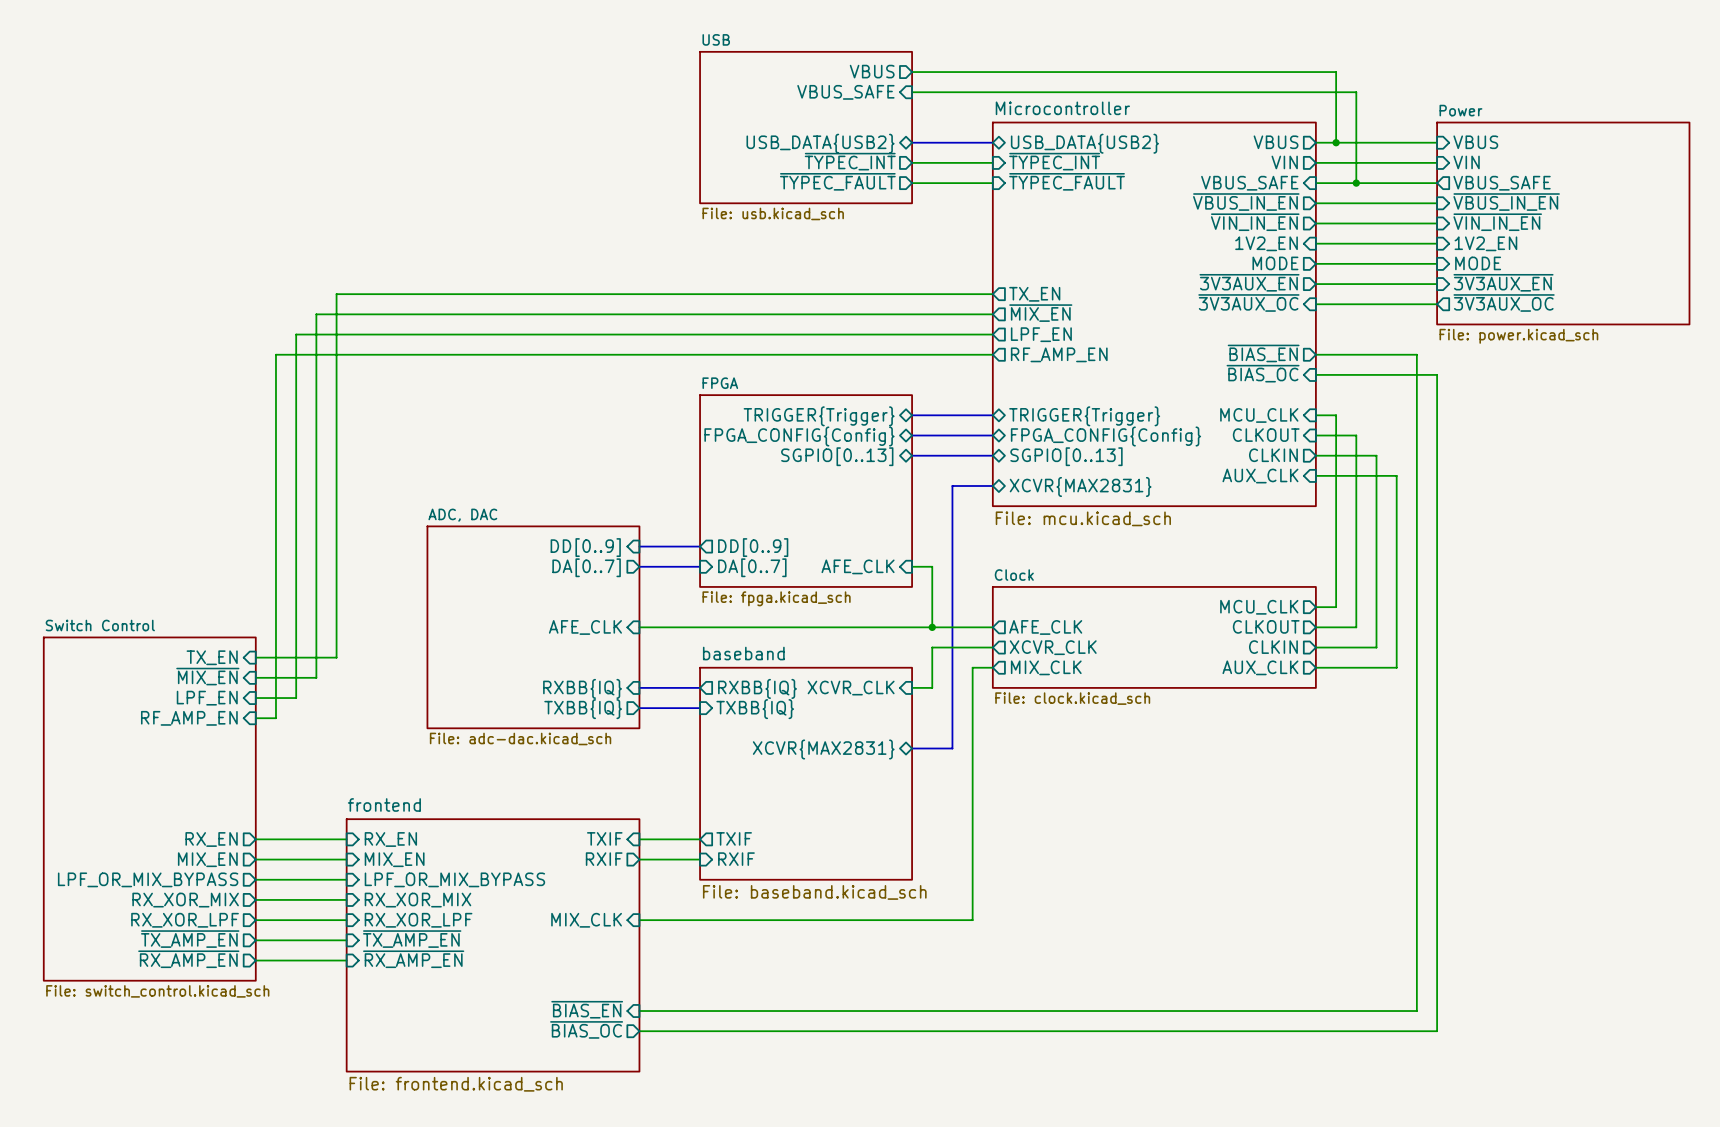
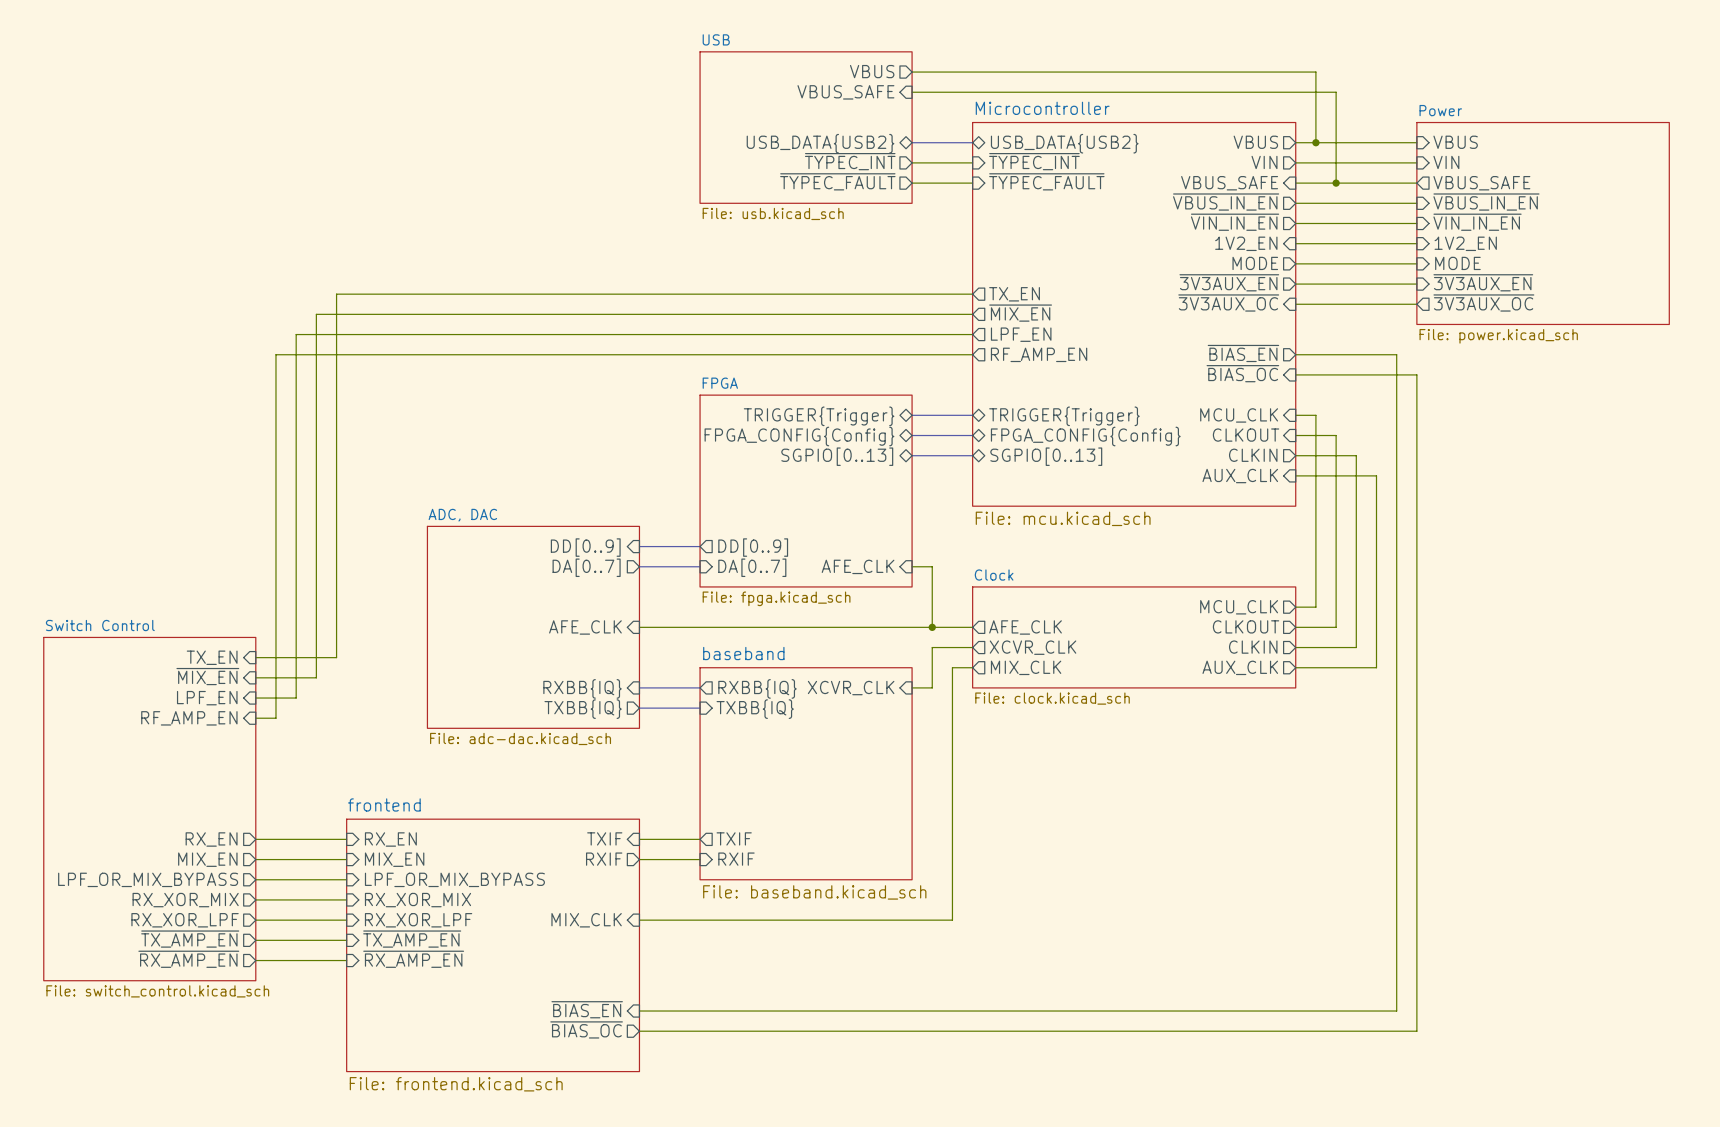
wire: (1315, 72) (1336, 72) (1336, 92) (1356, 92) (1356, 183) -> (1315, 72) (1315, 142) (1295, 142)
bus: (972, 142) (992, 142) -> none
sheet pin position: VBUS (1276, 142) -> VBUS (1255, 142)
junction: none -> (1315, 142)
wire: none -> (1336, 142) (1336, 183)
junction: (1336, 142) -> none
wire: (1416, 142) (1437, 142) -> none
sheet pin position: VBUS (1475, 142) -> VBUS (1455, 142)
sheet pin position: USB_DATA{USB2} (1084, 143) -> USB_DATA{USB2} (1064, 143)
sheet pin position: ~{TYPEC_INT} (1054, 161) -> ~{TYPEC_INT} (1034, 161)
wire: (972, 162) (992, 162) -> none
sheet pin position: VIN (1284, 162) -> VIN (1264, 162)
wire: (1416, 162) (1437, 162) -> (1295, 162) (1315, 162)
sheet pin position: VIN (1466, 162) -> VIN (1446, 162)
sheet pin position: ~{TYPEC_FAULT} (1067, 181) -> ~{TYPEC_FAULT} (1046, 181)
wire: (972, 183) (992, 183) -> none
sheet pin position: VBUS_SAFE (1249, 183) -> VBUS_SAFE (1229, 183)
junction: none -> (1336, 183)
junction: (1356, 183) -> none
wire: (1416, 183) (1437, 183) -> (1295, 183) (1315, 183)
sheet pin position: VBUS_SAFE (1502, 183) -> VBUS_SAFE (1481, 183)
sheet pin position: ~{VBUS_IN_EN} (1246, 202) -> ~{VBUS_IN_EN} (1226, 202)
sheet pin position: ~{VBUS_IN_EN} (1506, 202) -> ~{VBUS_IN_EN} (1486, 202)
wire: (1416, 203) (1437, 203) -> (1295, 203) (1315, 203)
sheet pin position: ~{VIN_IN_EN} (1255, 222) -> ~{VIN_IN_EN} (1235, 222)
sheet pin position: ~{VIN_IN_EN} (1497, 222) -> ~{VIN_IN_EN} (1477, 222)
wire: (1416, 223) (1437, 223) -> (1295, 223) (1315, 223)
sheet Power position: (1563, 223) -> (1543, 223)
sheet pin position: 1V2_EN (1266, 243) -> 1V2_EN (1246, 243)
wire: (1416, 243) (1437, 243) -> (1295, 243) (1315, 243)
sheet pin position: 1V2_EN (1485, 243) -> 1V2_EN (1465, 243)
sheet pin position: MODE (1275, 263) -> MODE (1255, 263)
wire: (1416, 263) (1437, 263) -> (1295, 263) (1315, 263)
sheet pin position: MODE (1478, 263) -> MODE (1457, 263)
sheet pin position: ~{3V3AUX_EN} (1249, 282) -> ~{3V3AUX_EN} (1229, 282)
sheet pin position: ~{3V3AUX_EN} (1503, 282) -> ~{3V3AUX_EN} (1483, 282)
wire: (1416, 284) (1437, 284) -> (1295, 284) (1315, 284)
wire: (972, 294) (992, 294) -> none
sheet pin position: TX_EN (1034, 294) -> TX_EN (1014, 294)
sheet pin position: ~{3V3AUX_OC} (1248, 302) -> ~{3V3AUX_OC} (1228, 302)
sheet pin position: ~{3V3AUX_OC} (1504, 302) -> ~{3V3AUX_OC} (1483, 302)
wire: (1416, 304) (1437, 304) -> (1295, 304) (1315, 304)
sheet pin position: ~{MIX_EN} (1040, 313) -> ~{MIX_EN} (1020, 313)
wire: (972, 314) (992, 314) -> none
sheet Microcontroller position: (1154, 314) -> (1134, 314)
wire: (972, 334) (992, 334) -> none
sheet pin position: LPF_EN (1041, 334) -> LPF_EN (1021, 334)
sheet pin position: ~{BIAS_EN} (1263, 353) -> ~{BIAS_EN} (1243, 353)
wire: (972, 354) (992, 354) -> none
sheet pin position: RF_AMP_EN (1059, 354) -> RF_AMP_EN (1039, 354)
wire: none -> (1295, 354) (1315, 354)
wire: (1396, 354) (1416, 354) (1416, 374) (1437, 374) (1437, 1031) (1416, 1031) -> none
sheet pin position: ~{BIAS_OC} (1263, 373) -> ~{BIAS_OC} (1242, 373)
wire: none -> (1295, 374) (1315, 374)
bus: (972, 415) (992, 415) -> none
sheet pin position: MCU_CLK (1259, 415) -> MCU_CLK (1239, 415)
wire: none -> (1295, 415) (1315, 415) (1315, 607) (1295, 607)
wire: (1315, 415) (1336, 415) (1336, 435) (1356, 435) (1356, 455) (1376, 455) (1376, 475) (1396, 475) -> (1396, 354) (1396, 475)
sheet pin position: TRIGGER{Trigger} (1084, 416) -> TRIGGER{Trigger} (1064, 416)
bus: (972, 435) (992, 435) -> none
sheet pin position: CLKOUT (1266, 435) -> CLKOUT (1246, 435)
wire: none -> (1295, 435) (1315, 435)
sheet pin position: FPGA_CONFIG{Config} (1105, 436) -> FPGA_CONFIG{Config} (1085, 436)
bus: (972, 455) (992, 455) -> none
sheet pin position: CLKIN (1273, 455) -> CLKIN (1253, 455)
wire: none -> (1295, 455) (1315, 455)
sheet pin position: SGPIO[0..13] (1066, 456) -> SGPIO[0..13] (1046, 456)
wire: none -> (1295, 475) (1315, 475)
sheet pin position: AUX_CLK (1260, 476) -> AUX_CLK (1240, 476)
bus: (992, 485) (952, 485) (952, 748) (912, 748) -> none
sheet pin: XCVR{MAX2831} (1080, 486) -> none
sheet pin position: MCU_CLK (1259, 607) -> MCU_CLK (1239, 607)
wire: (1315, 607) (1336, 607) -> (1336, 627) (1336, 607)
sheet pin position: CLKOUT (1266, 626) -> CLKOUT (1246, 626)
wire: (972, 627) (992, 627) -> none
sheet pin position: AFE_CLK (1045, 627) -> AFE_CLK (1025, 627)
wire: none -> (1295, 627) (1315, 627)
wire: (1336, 627) (1356, 627) -> (1356, 647) (1356, 627)
sheet Clock position: (1154, 637) -> (1134, 637)
wire: (972, 647) (992, 647) -> none
sheet pin position: XCVR_CLK (1053, 647) -> XCVR_CLK (1033, 647)
sheet pin position: CLKIN (1273, 647) -> CLKIN (1253, 647)
wire: (1356, 647) (1376, 647) -> (1295, 647) (1315, 647)
wire: (992, 667) (972, 667) (972, 920) (952, 920) -> (972, 667) (952, 667) (952, 920)
sheet pin position: MIX_CLK (1046, 667) -> MIX_CLK (1026, 667)
sheet pin position: AUX_CLK (1260, 667) -> AUX_CLK (1240, 667)
wire: none -> (1295, 667) (1315, 667)
wire: (1376, 667) (1396, 667) -> (1376, 667) (1376, 647)
wire: none -> (1396, 667) (1396, 1011)
sheet pin: XCVR{MAX2831} (823, 749) -> none
wire: (1396, 1011) (1416, 1011) -> (1416, 1031) (1416, 1011)

